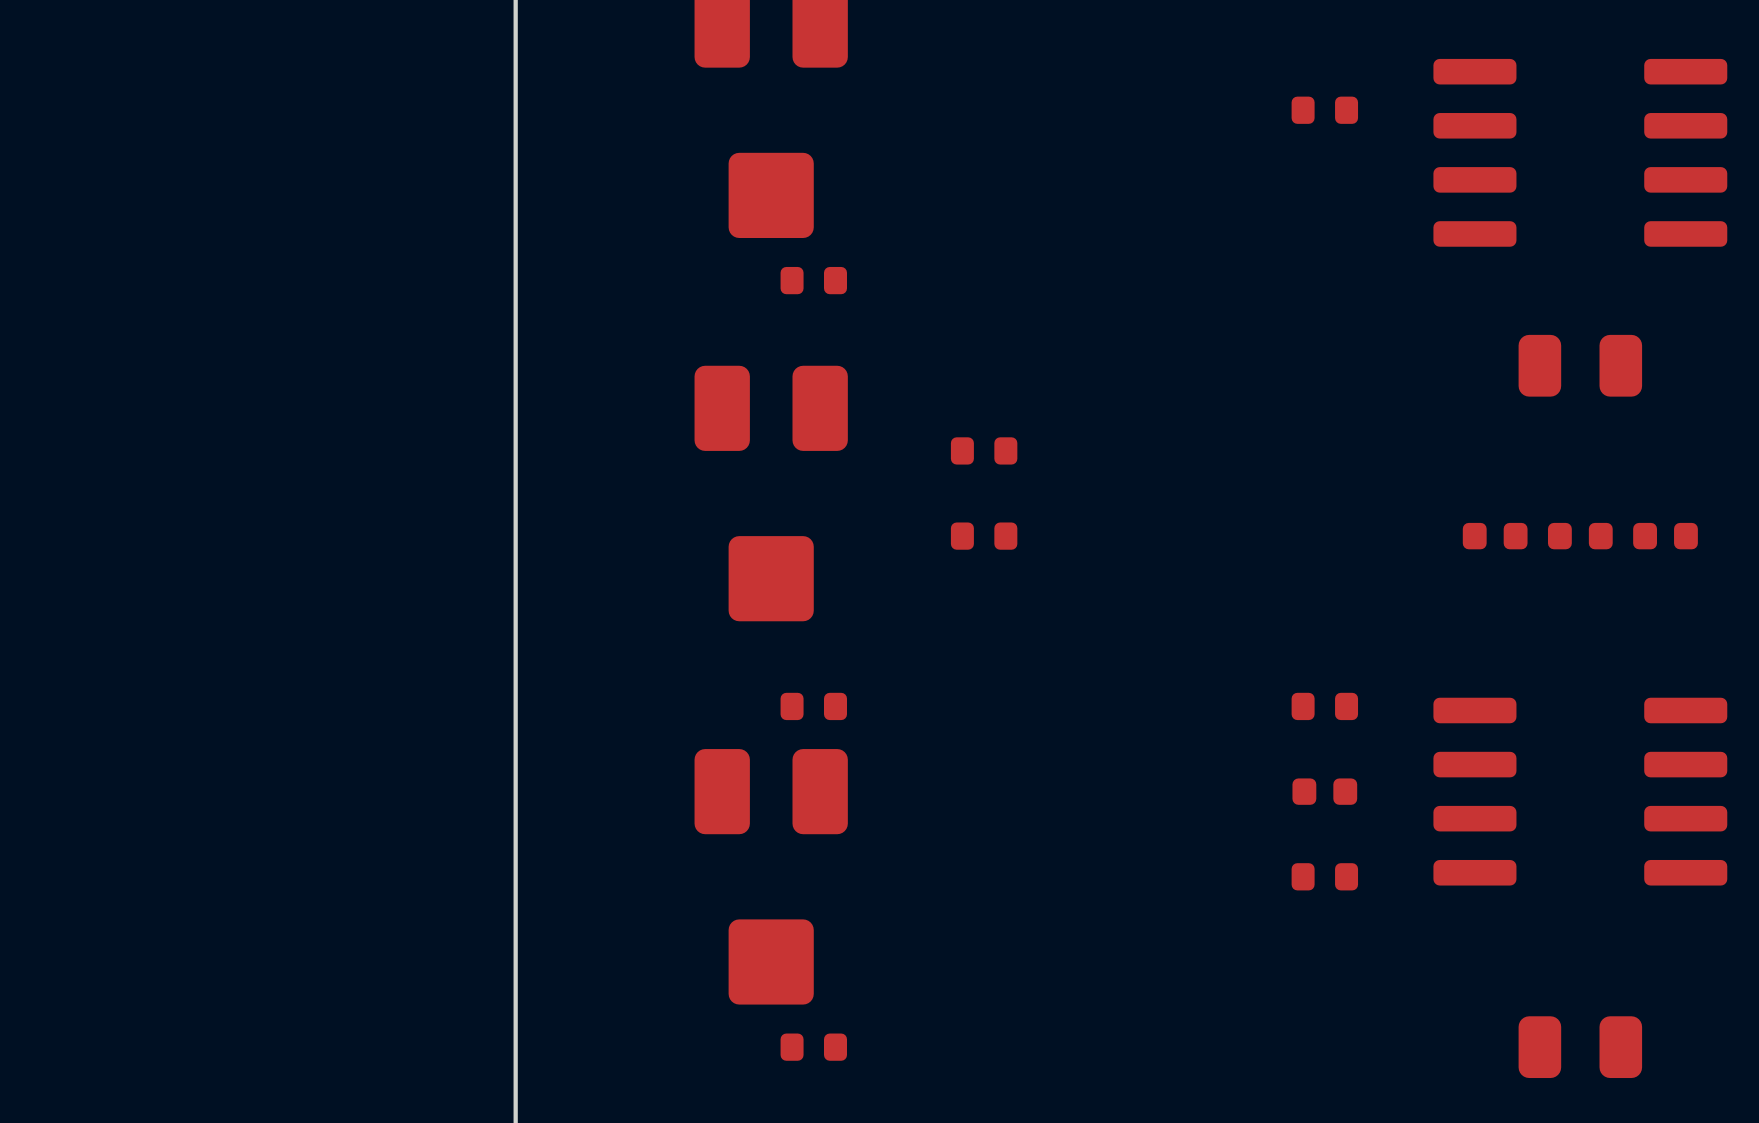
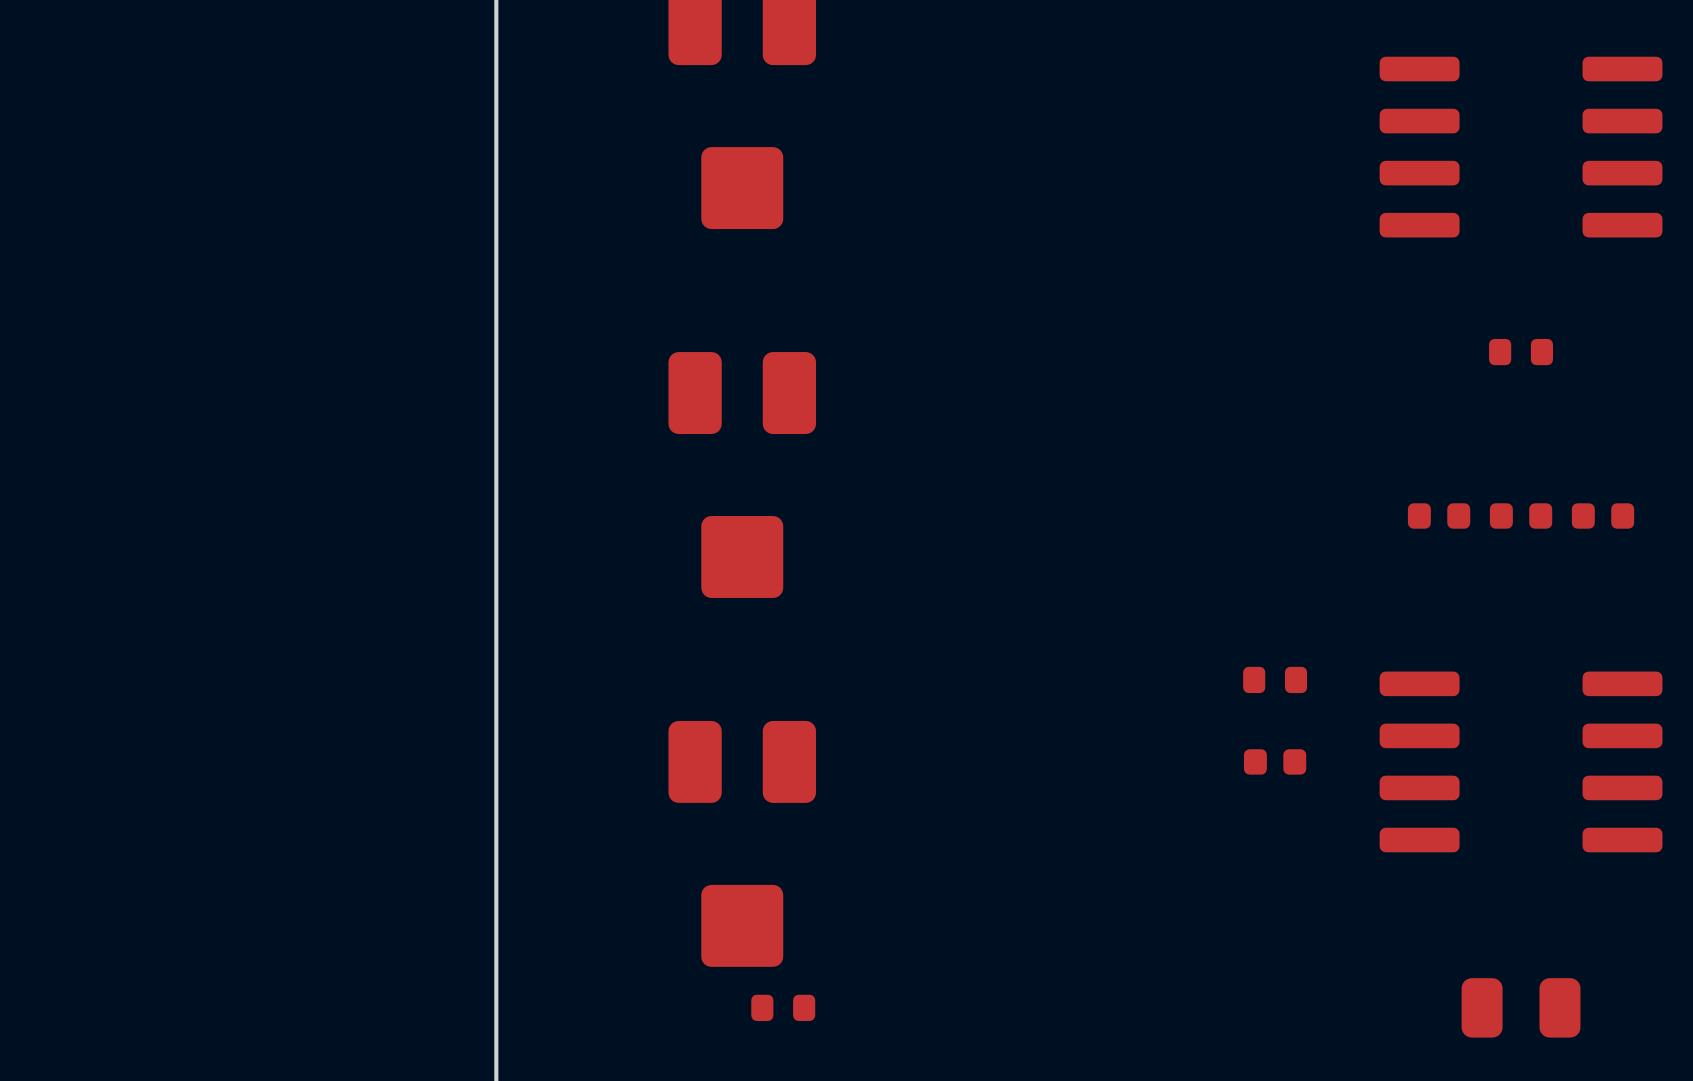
part: (1324, 110) -> none
part: (813, 280) -> none
part footprint: [1518, 334, 1643, 397] -> [1489, 338, 1554, 366]
part: (984, 450) -> none
part: (984, 536) -> none
part: (813, 706) -> none
part: (1324, 876) -> none

